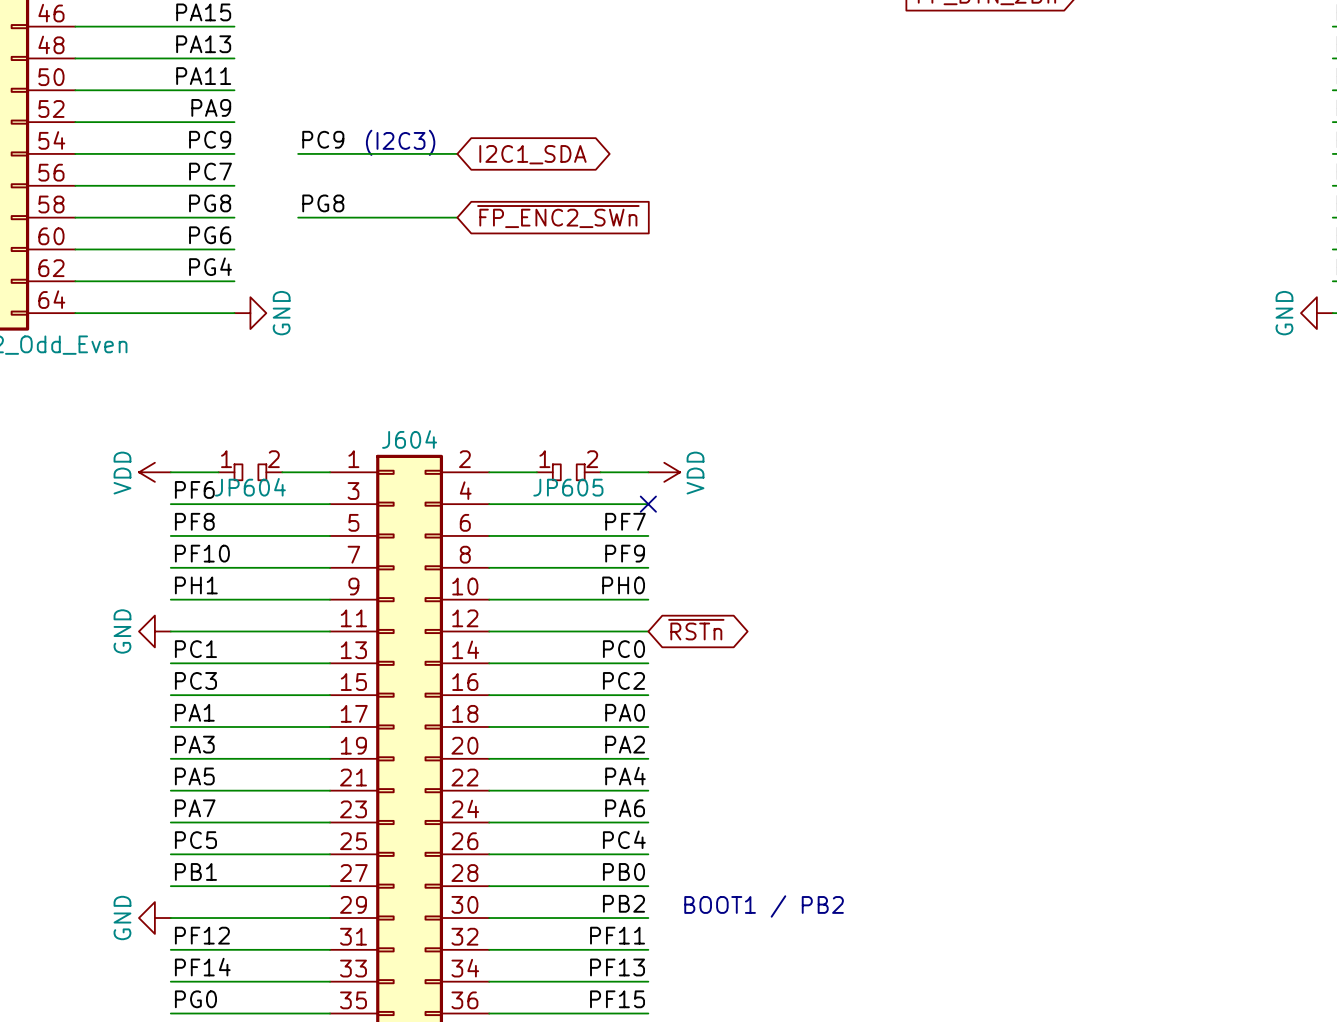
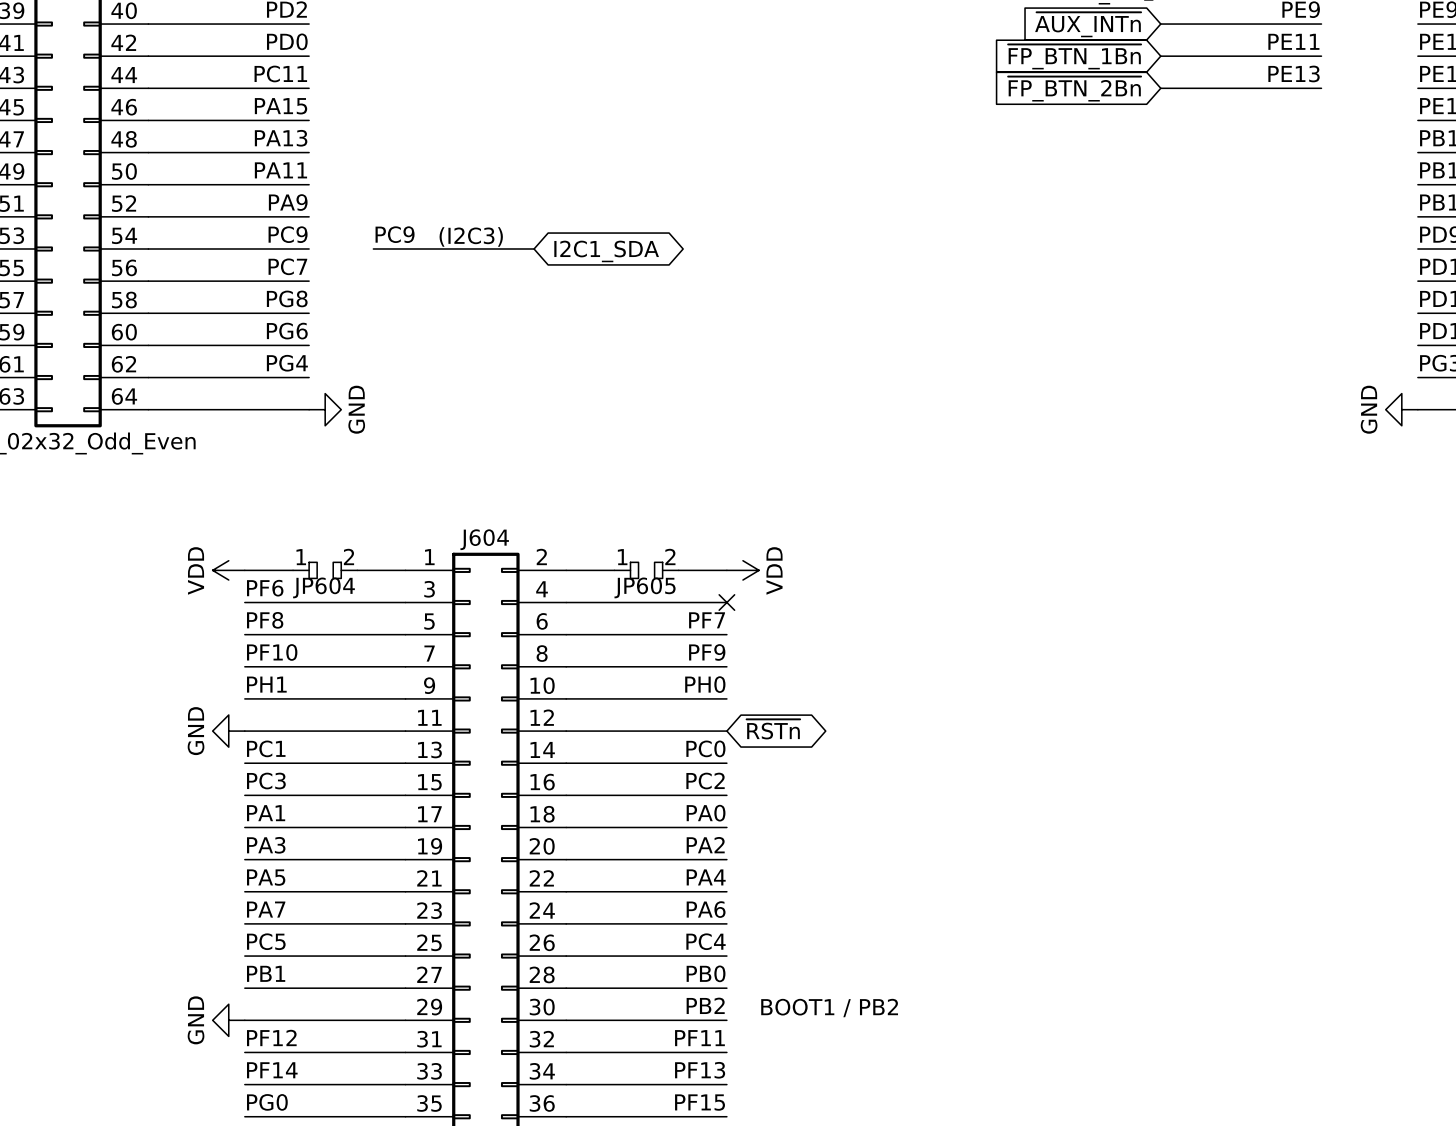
label: PG8 (323, 203) -> none
global label: ~{FP_ENC2_SWn} (558, 216) -> none
wire: (298, 217) (457, 217) -> none

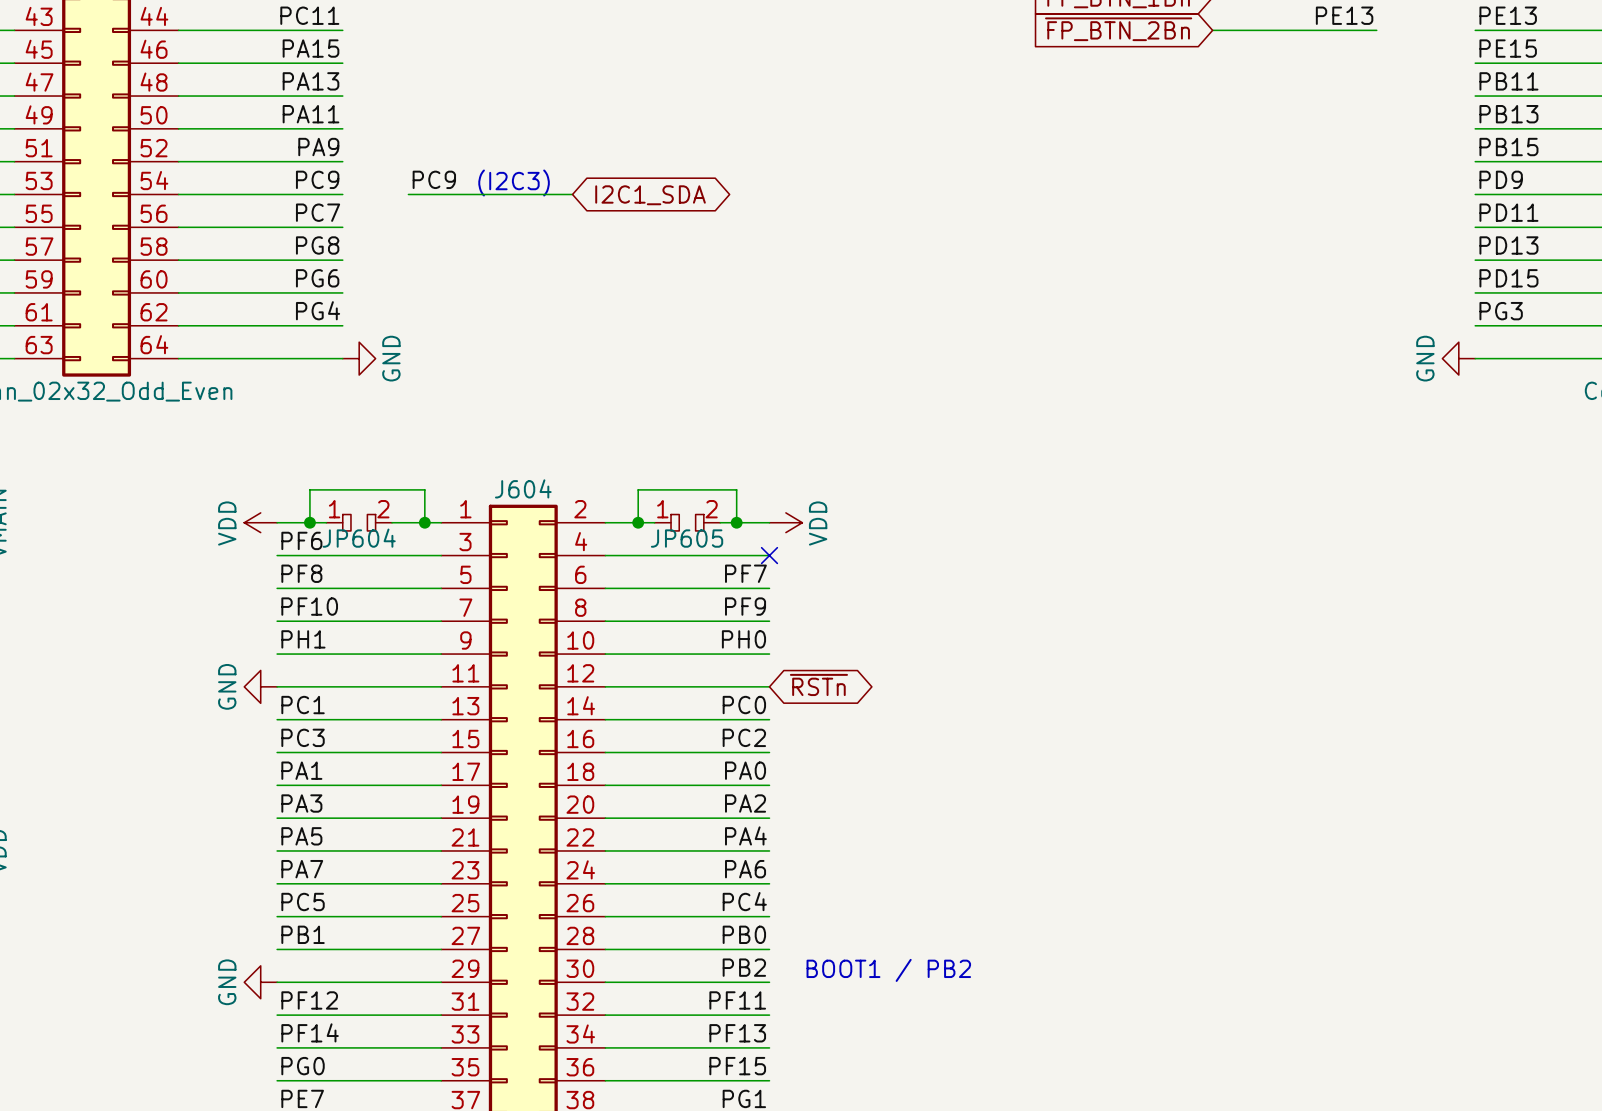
wire: none -> (309, 522) (309, 489) (424, 489) (424, 522)
junction: none -> (309, 522)
junction: none -> (424, 522)
wire: none -> (638, 522) (638, 489) (736, 489) (736, 522)
junction: none -> (638, 522)
junction: none -> (736, 522)

